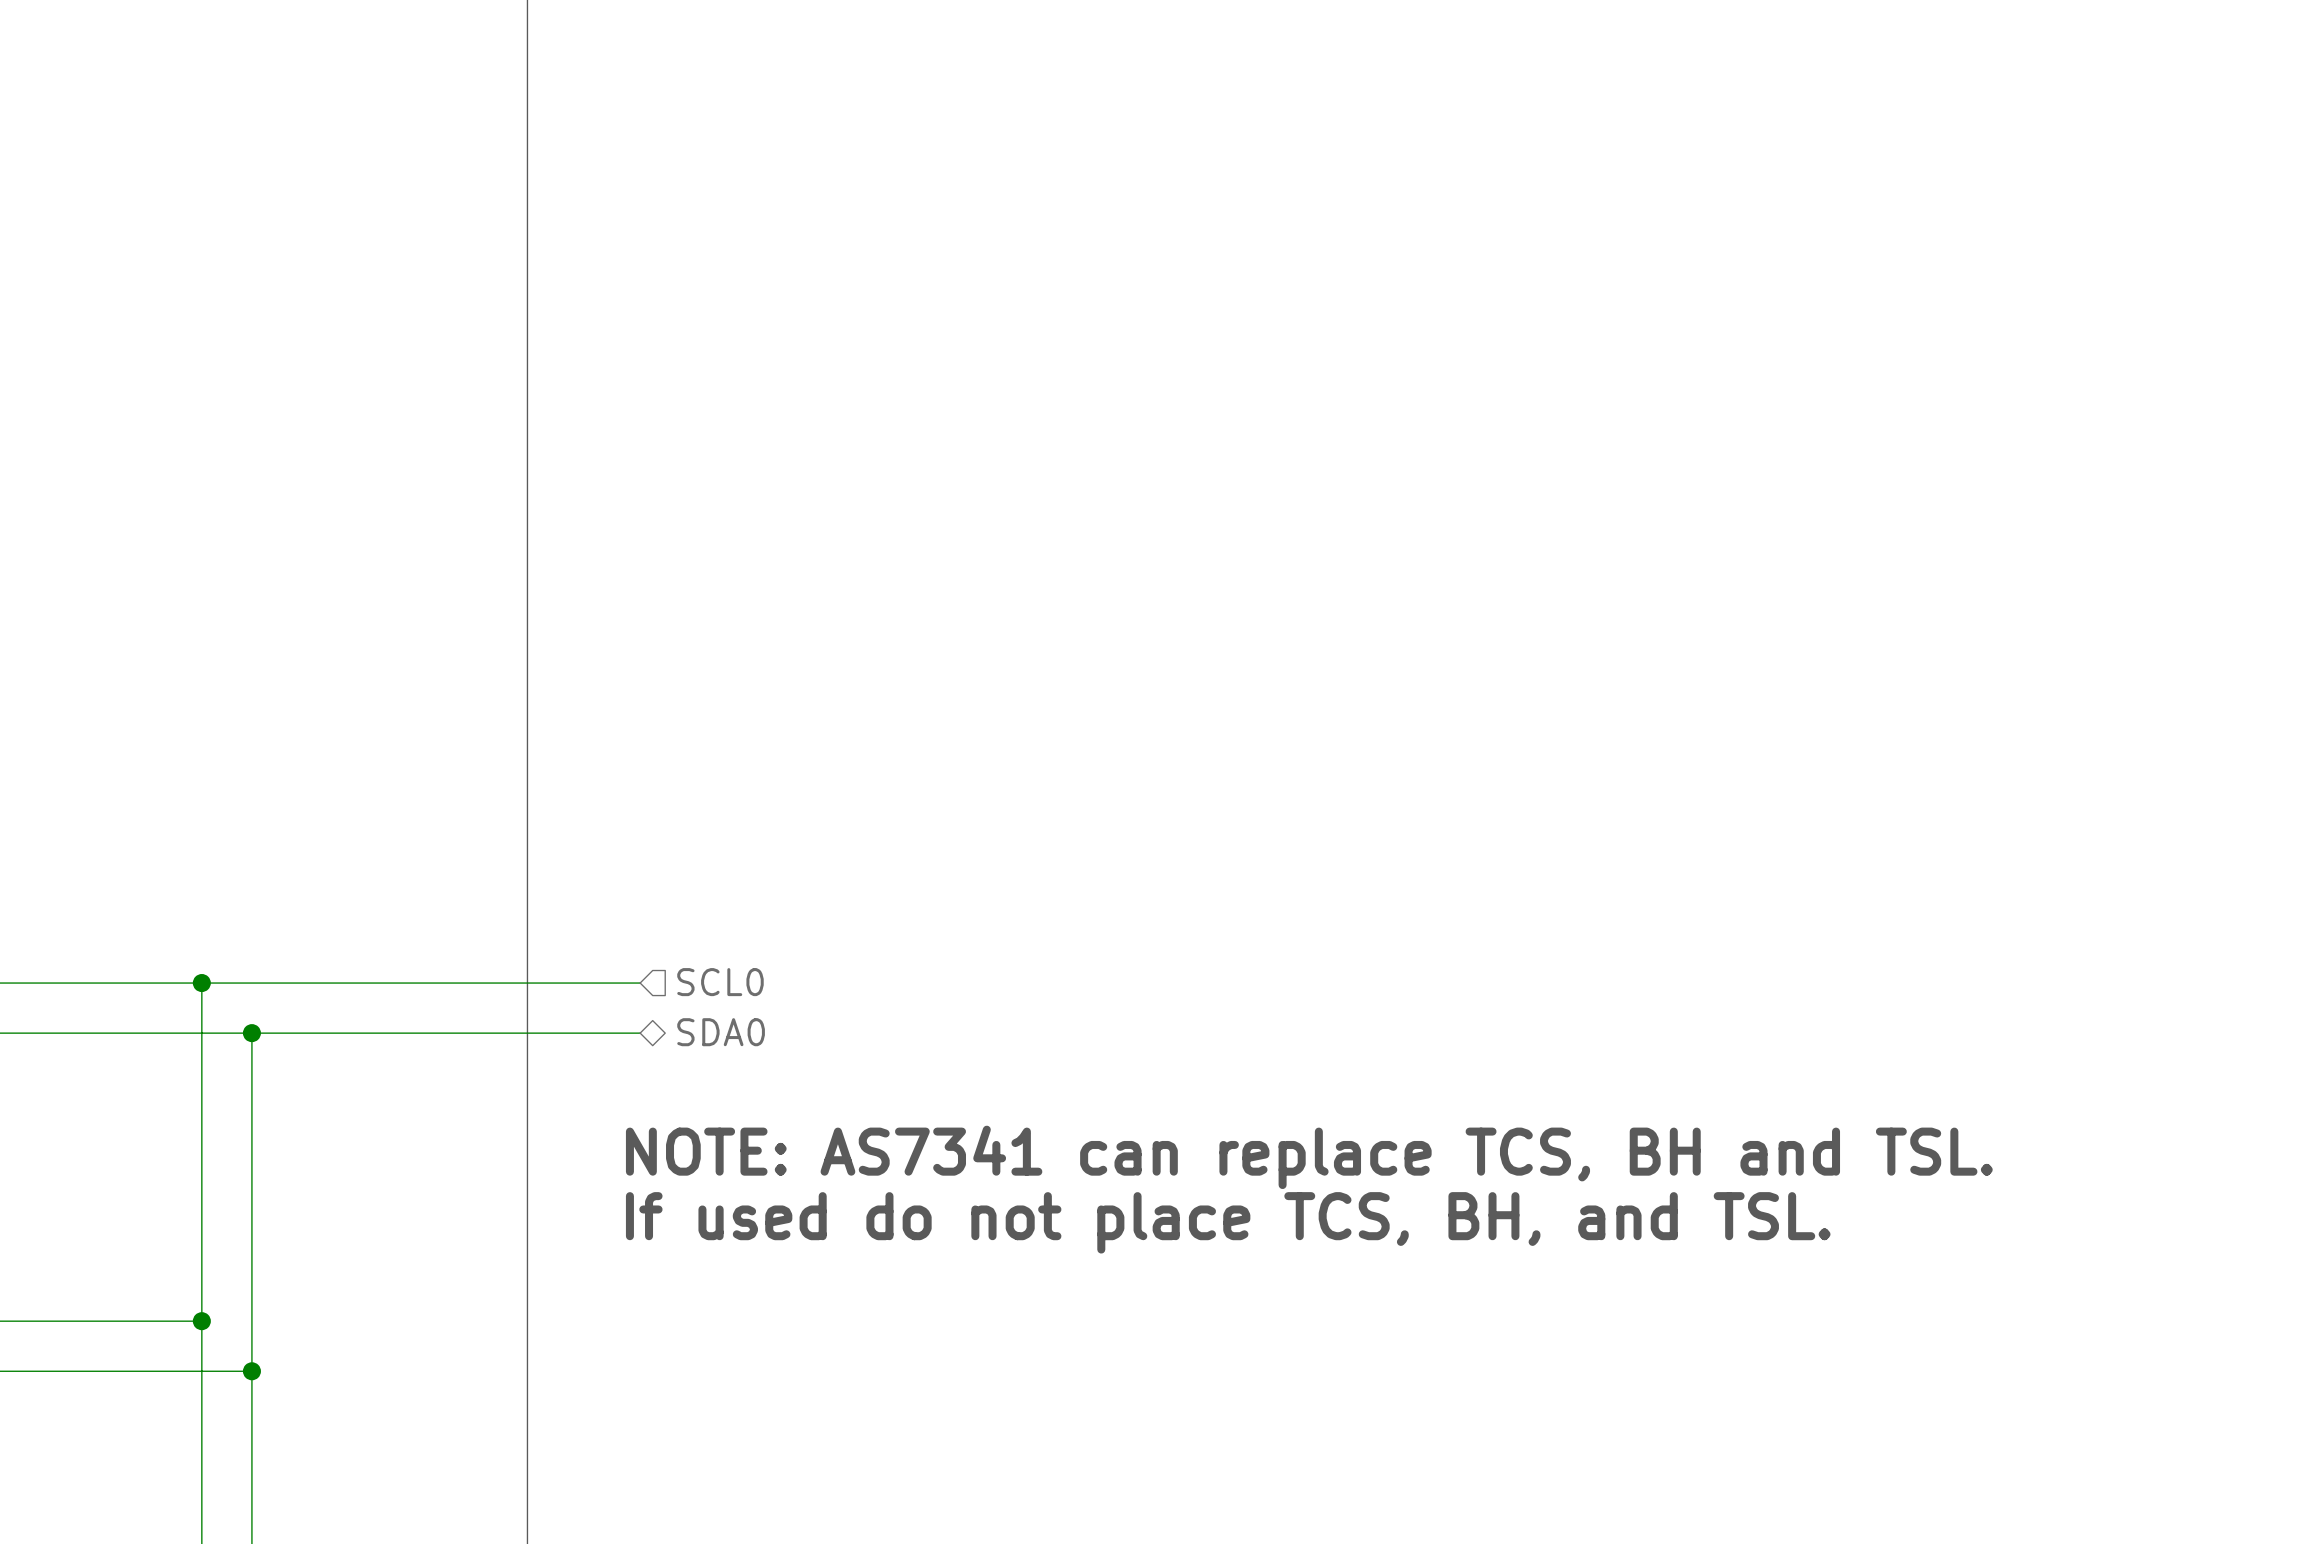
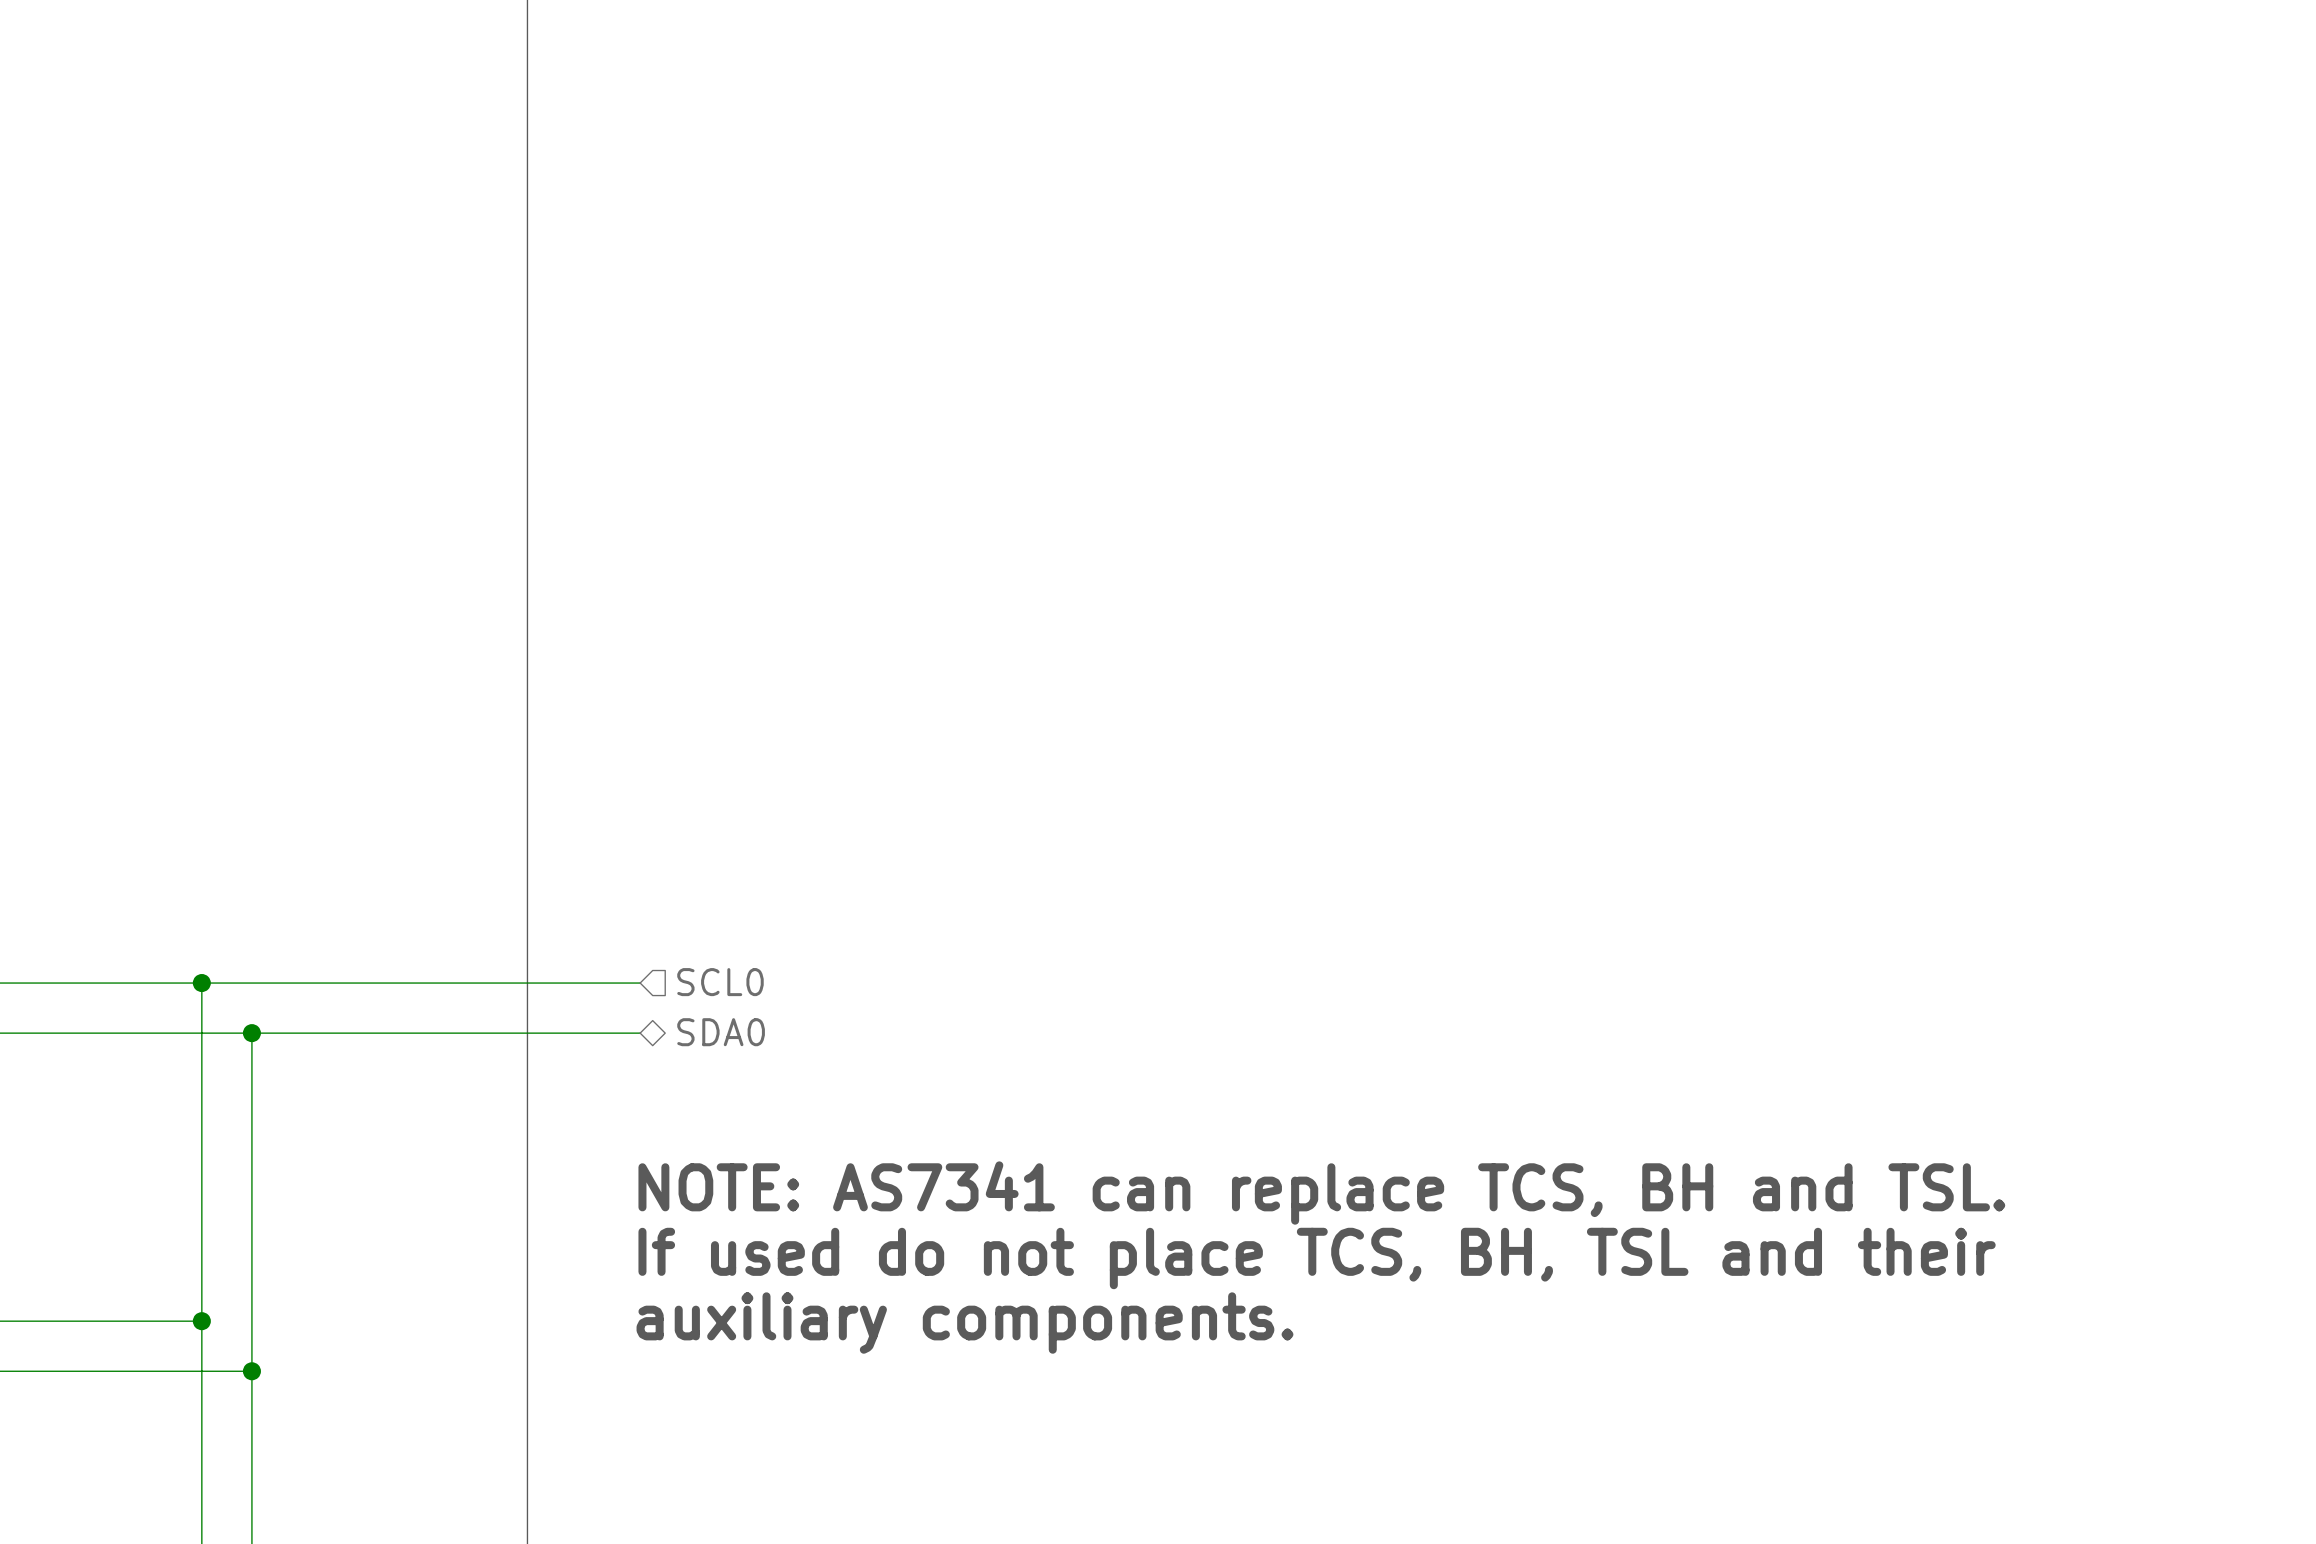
text position: NOTE: AS7341 can replace TCS, BH and TSL. (1309, 1157) -> NOTE: AS7341 can replace TCS, BH and TSL. (1321, 1193)
text: If used do not place TCS, BH, and TSL. (1228, 1222) -> If used do not place TCS, BH, TSL and their (1317, 1258)
text: none -> auxiliary components. (964, 1323)

